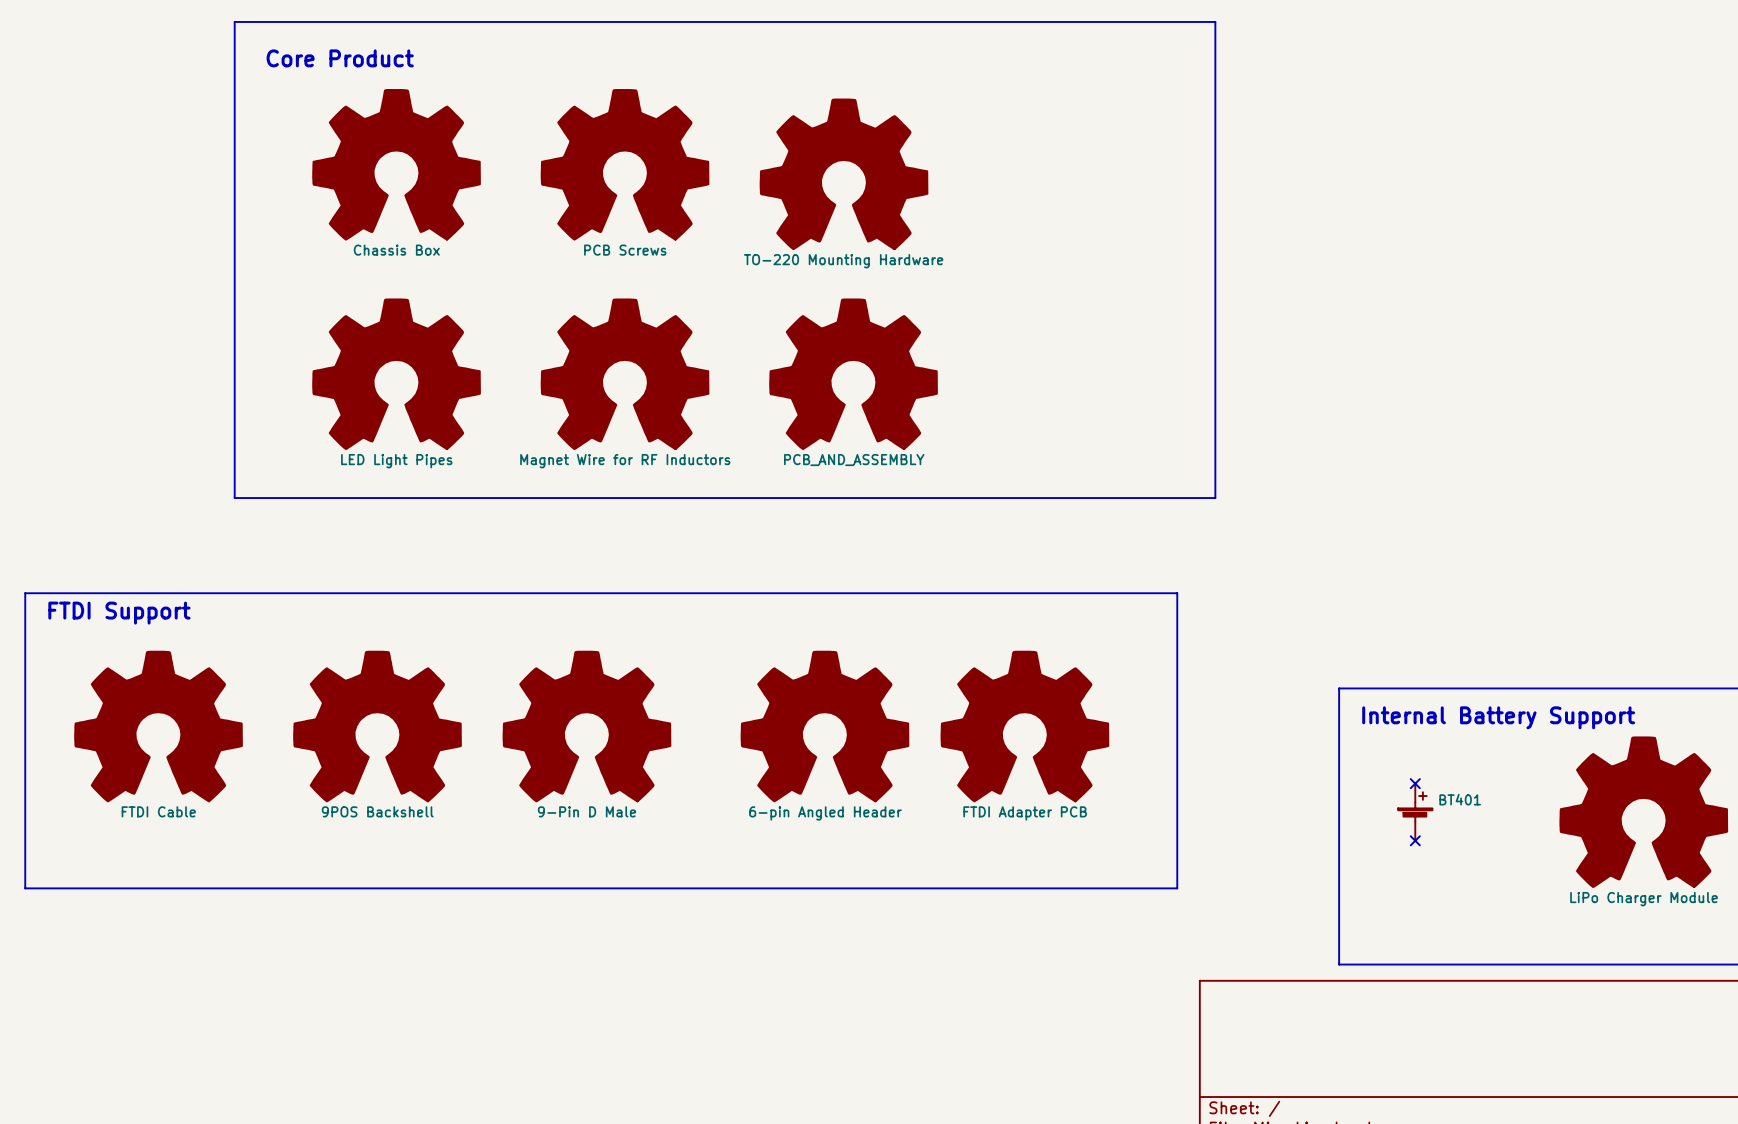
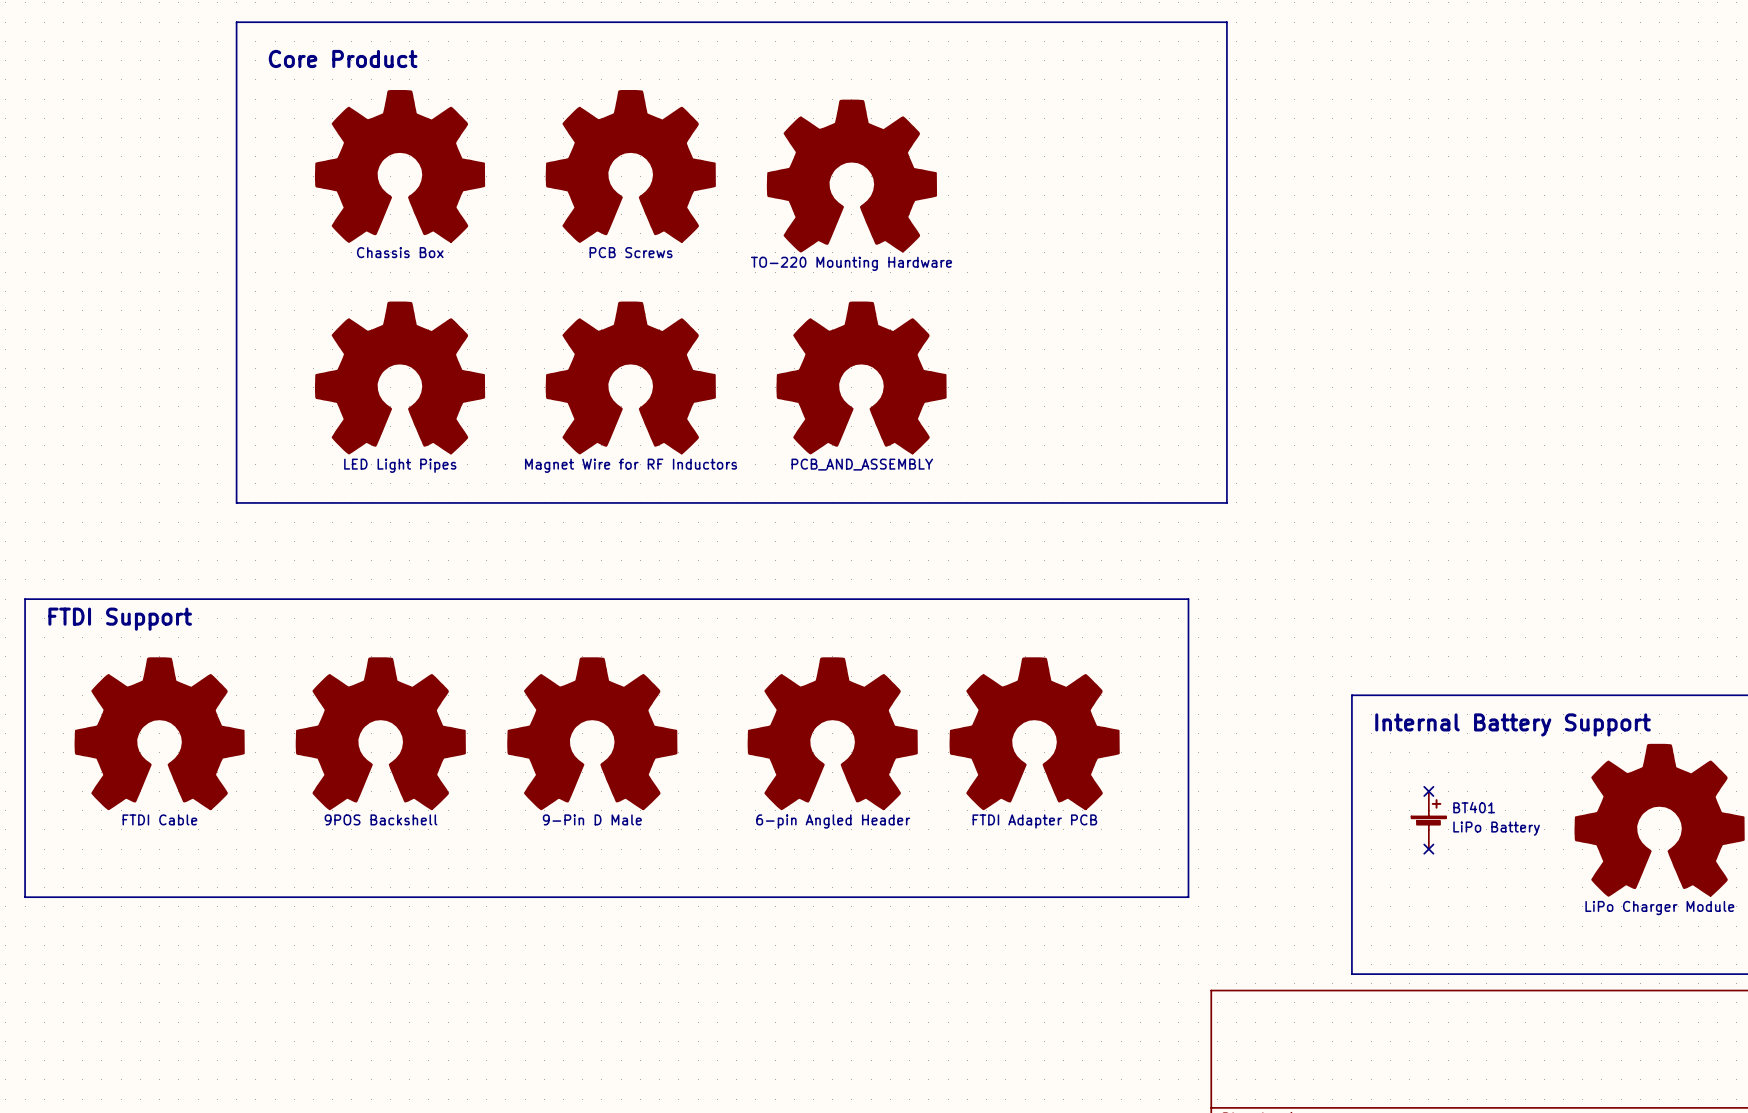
BT401 value: none -> LiPo Battery (1496, 828)

